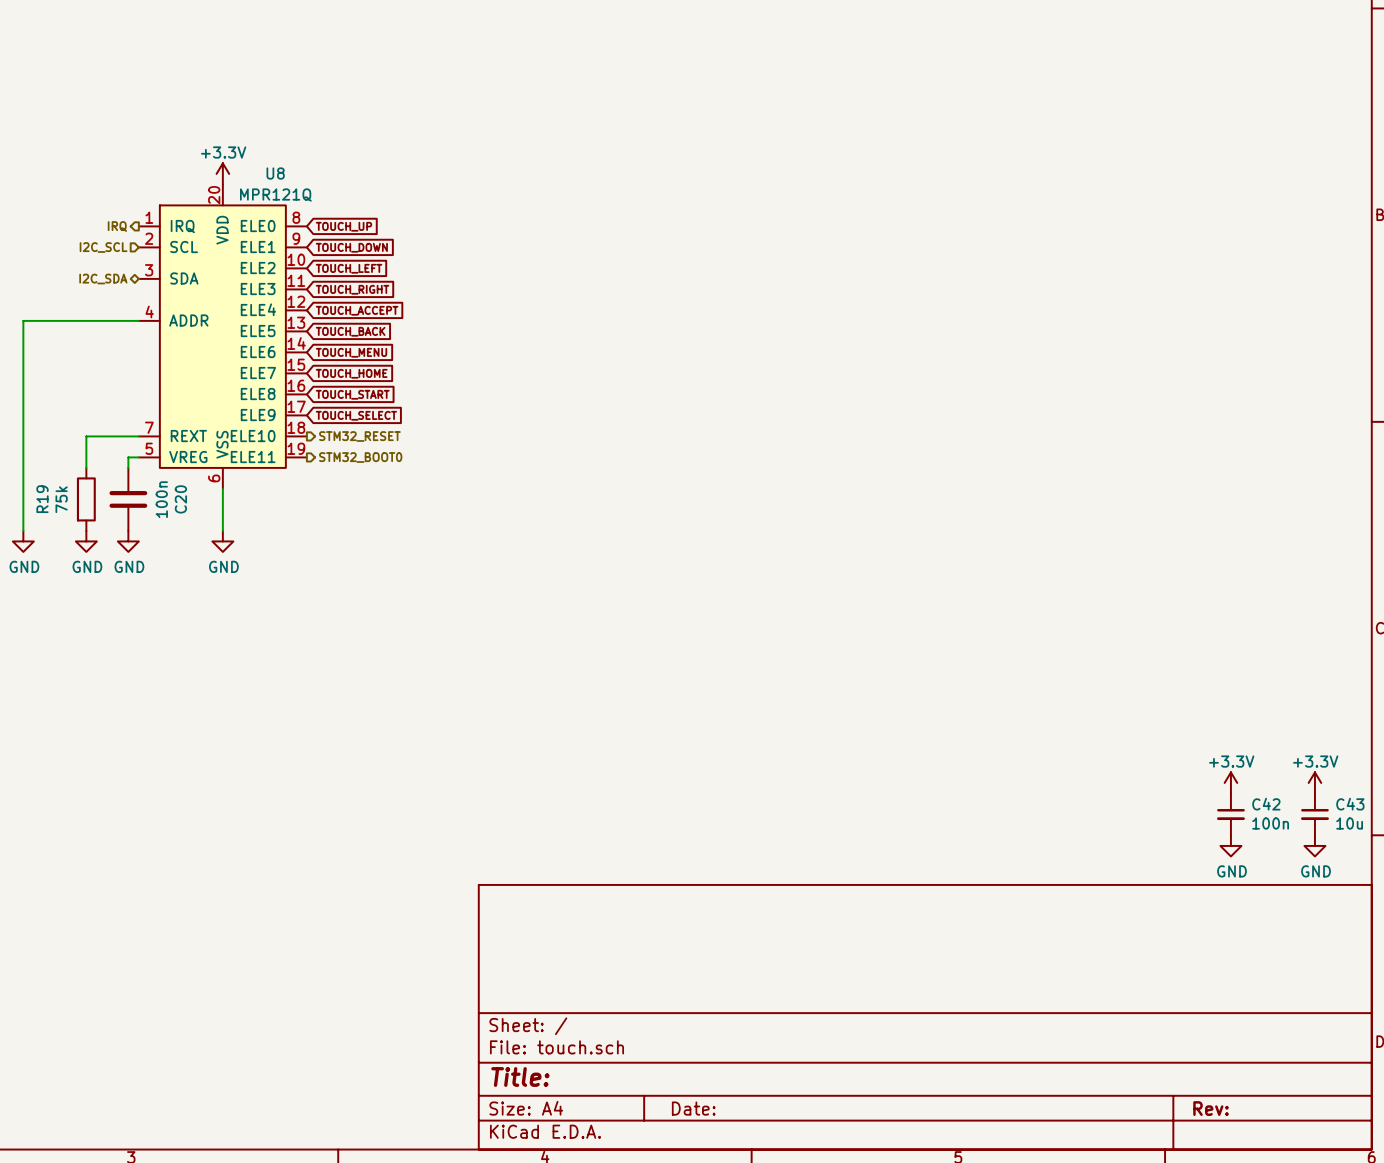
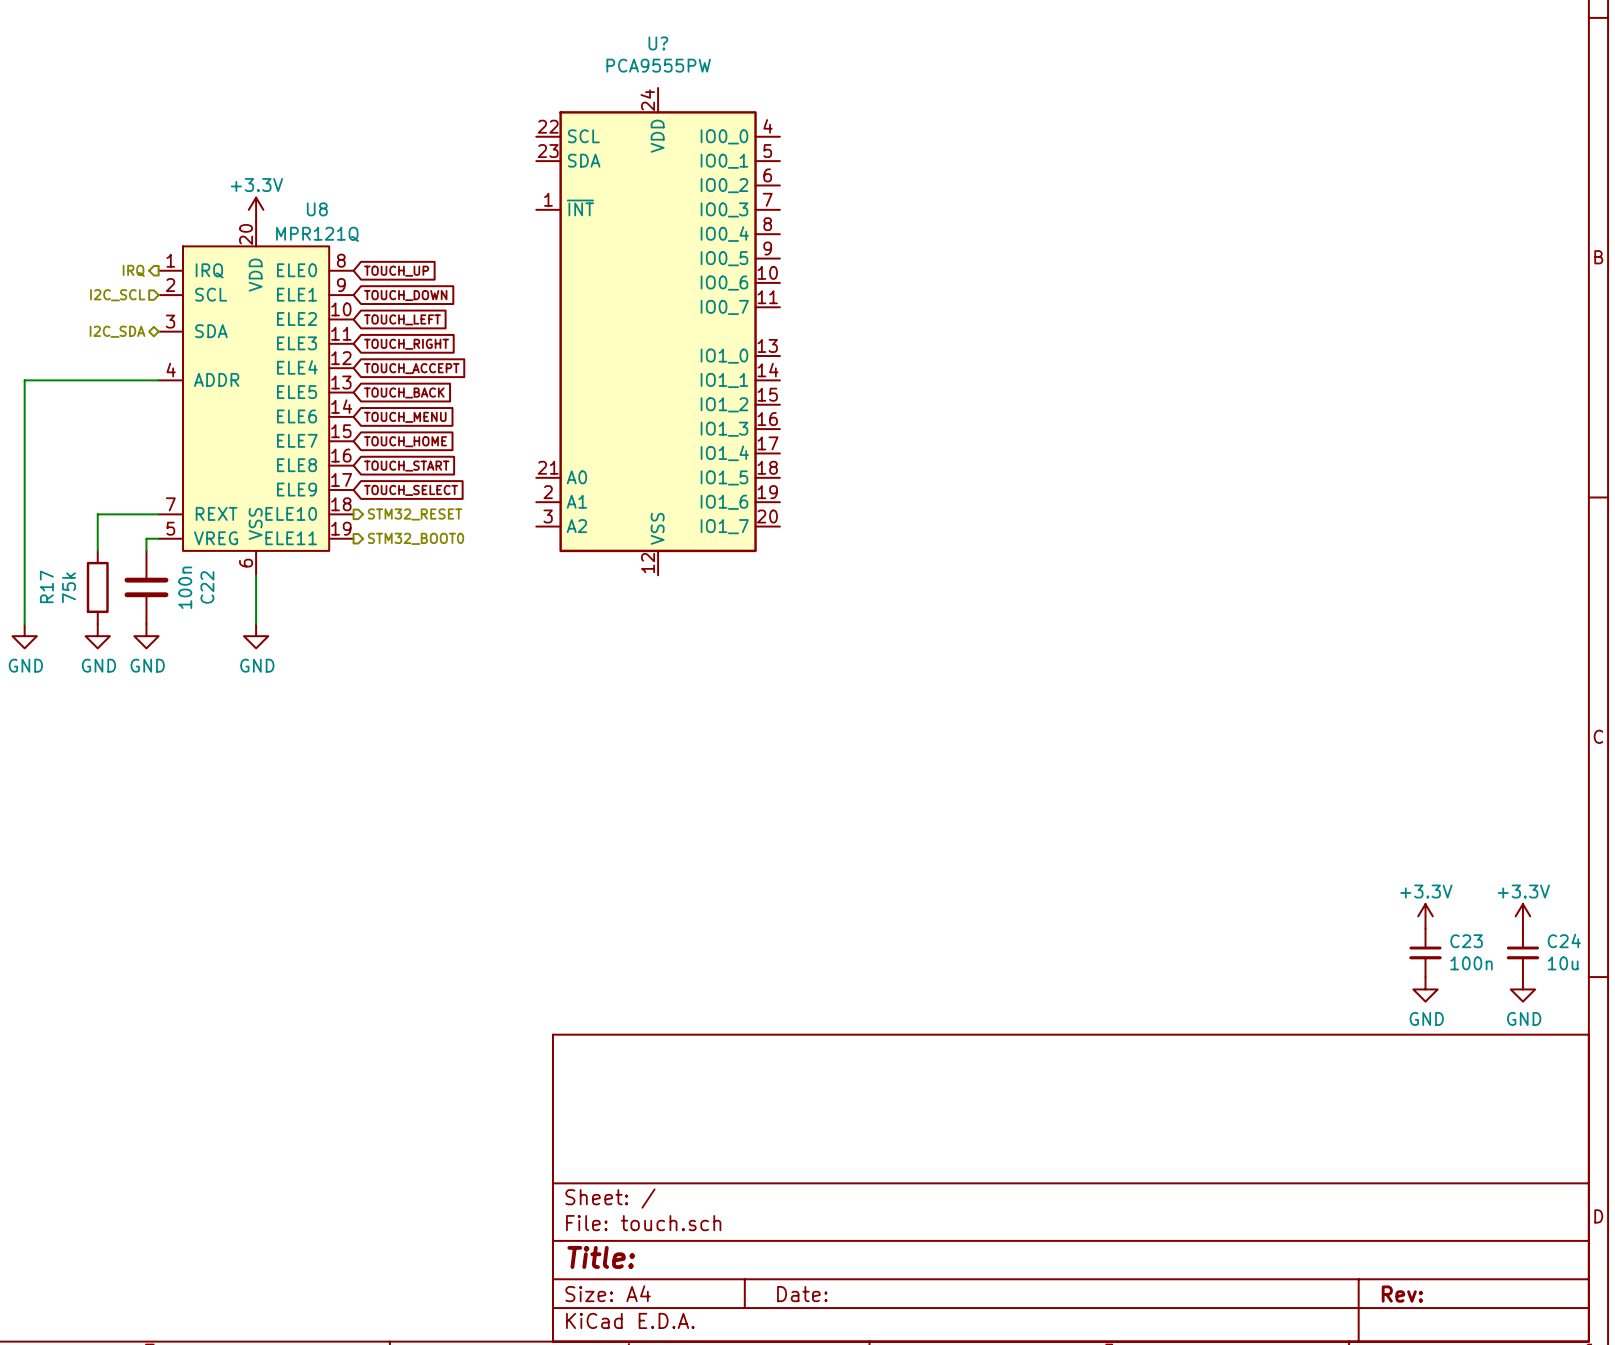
U?: none -> PCA9555PW (658, 331)
R19 name: R19 (42, 499) -> R17 (46, 586)
C20 name: C20 (180, 499) -> C22 (207, 587)
C42 name: C42 (1266, 804) -> C23 (1466, 941)
C43 name: C43 (1350, 804) -> C24 (1564, 940)

